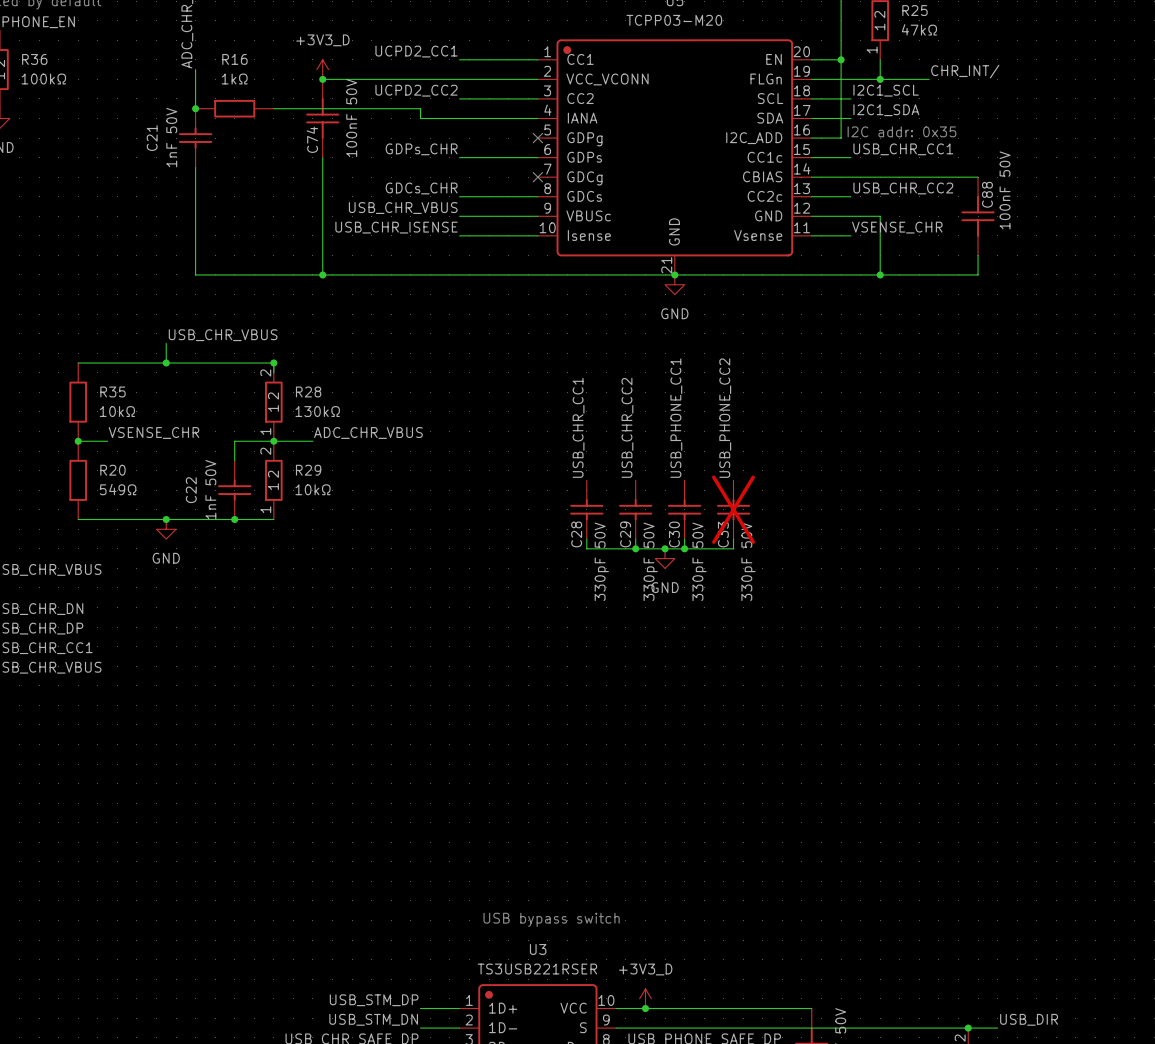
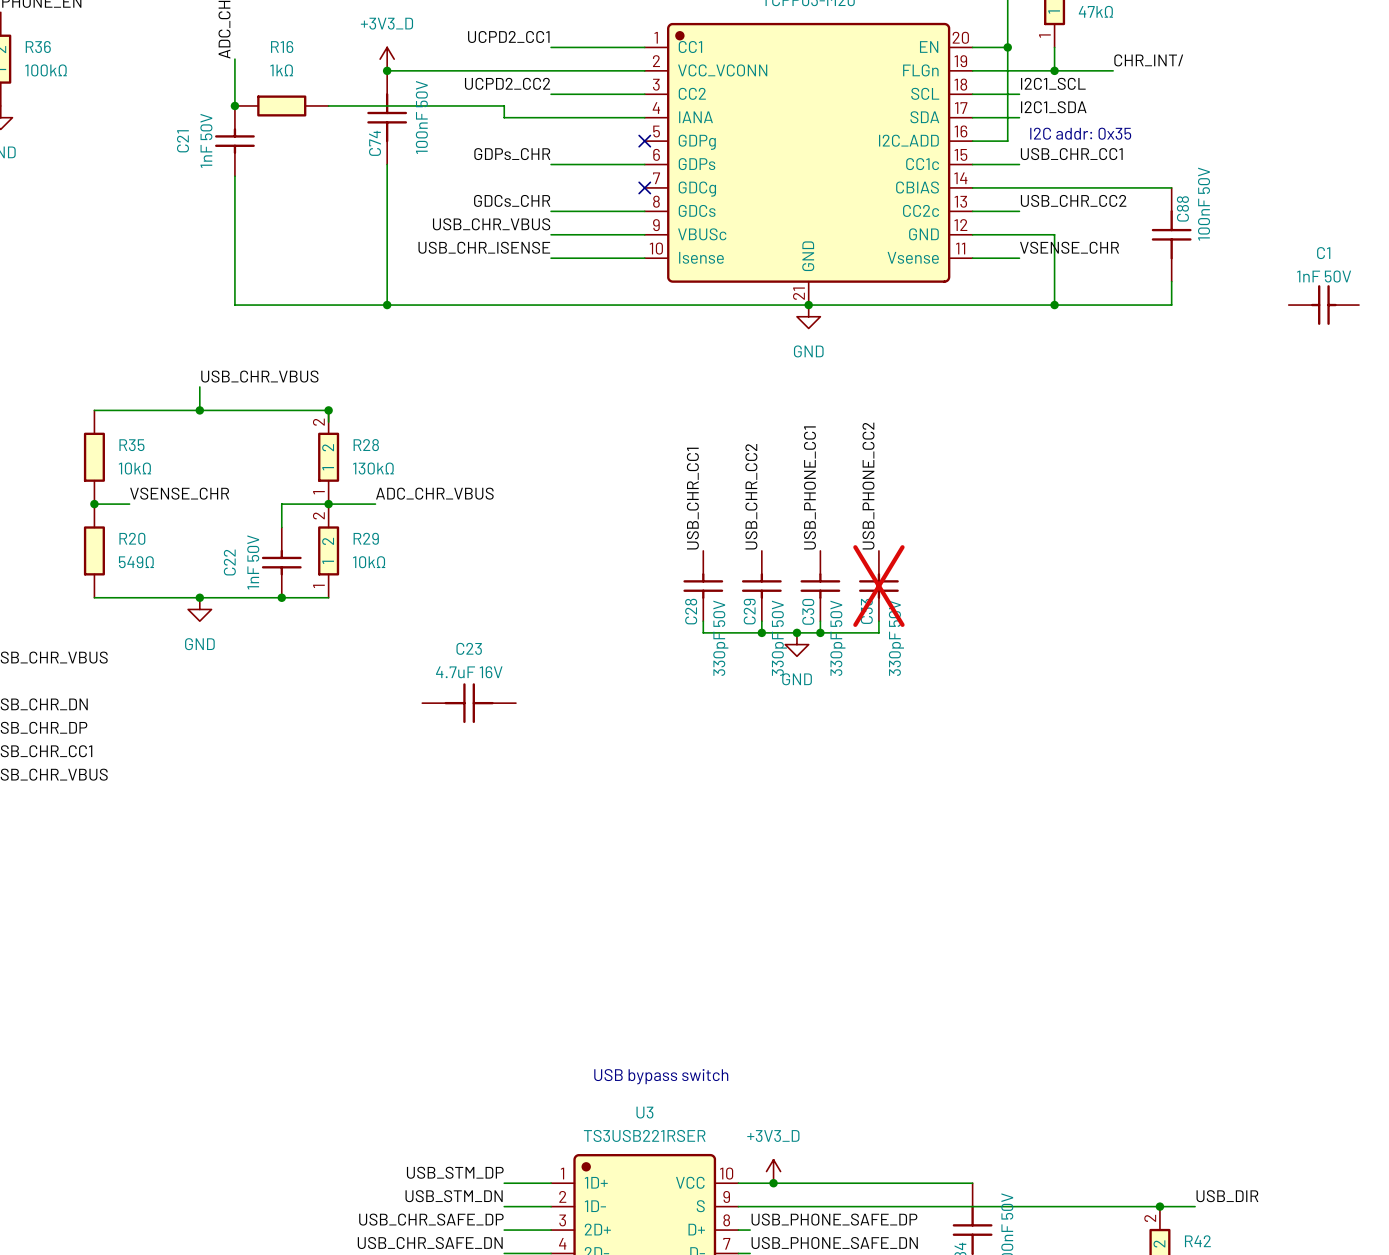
C1: none -> 1nF 50V (1323, 305)
C23: none -> 4.7uF 16V (469, 703)

